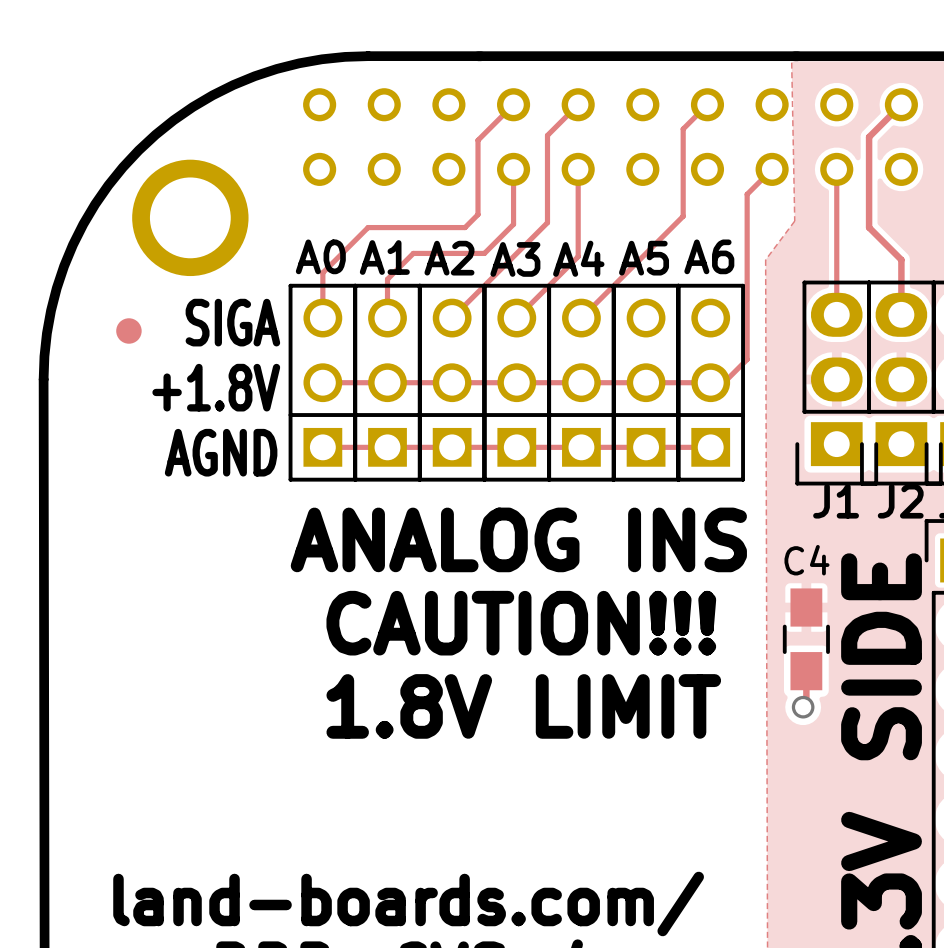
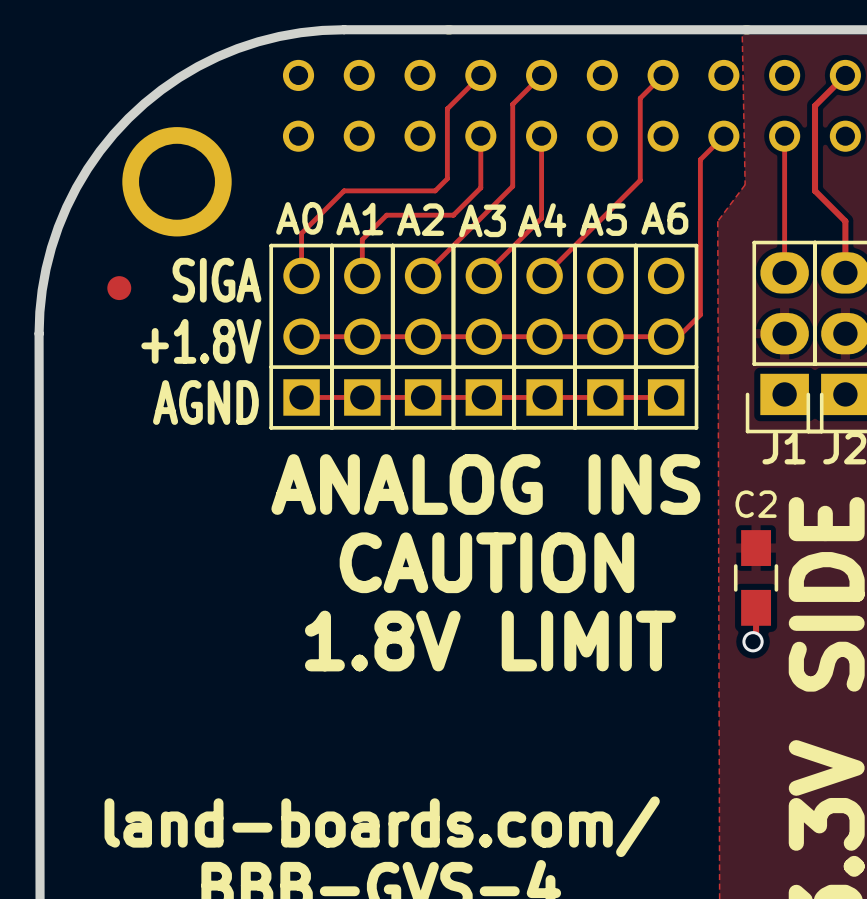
C4 name: C4 (806, 560) -> C2 (756, 504)
text: CAUTION!!! (521, 623) -> CAUTION (486, 562)

